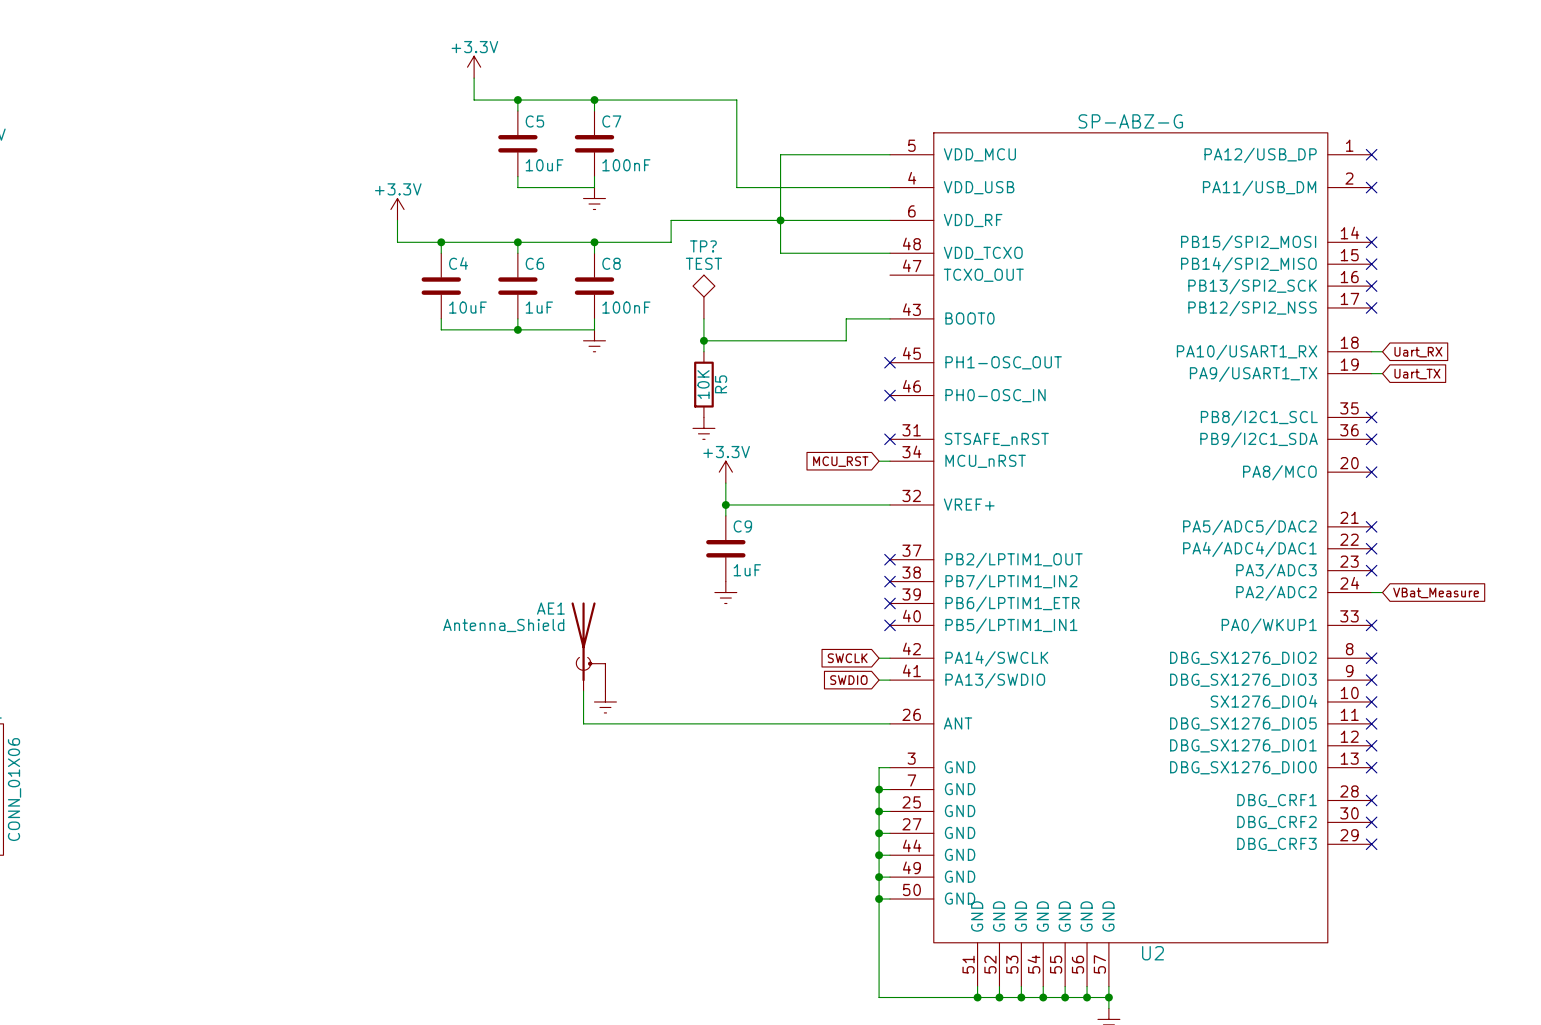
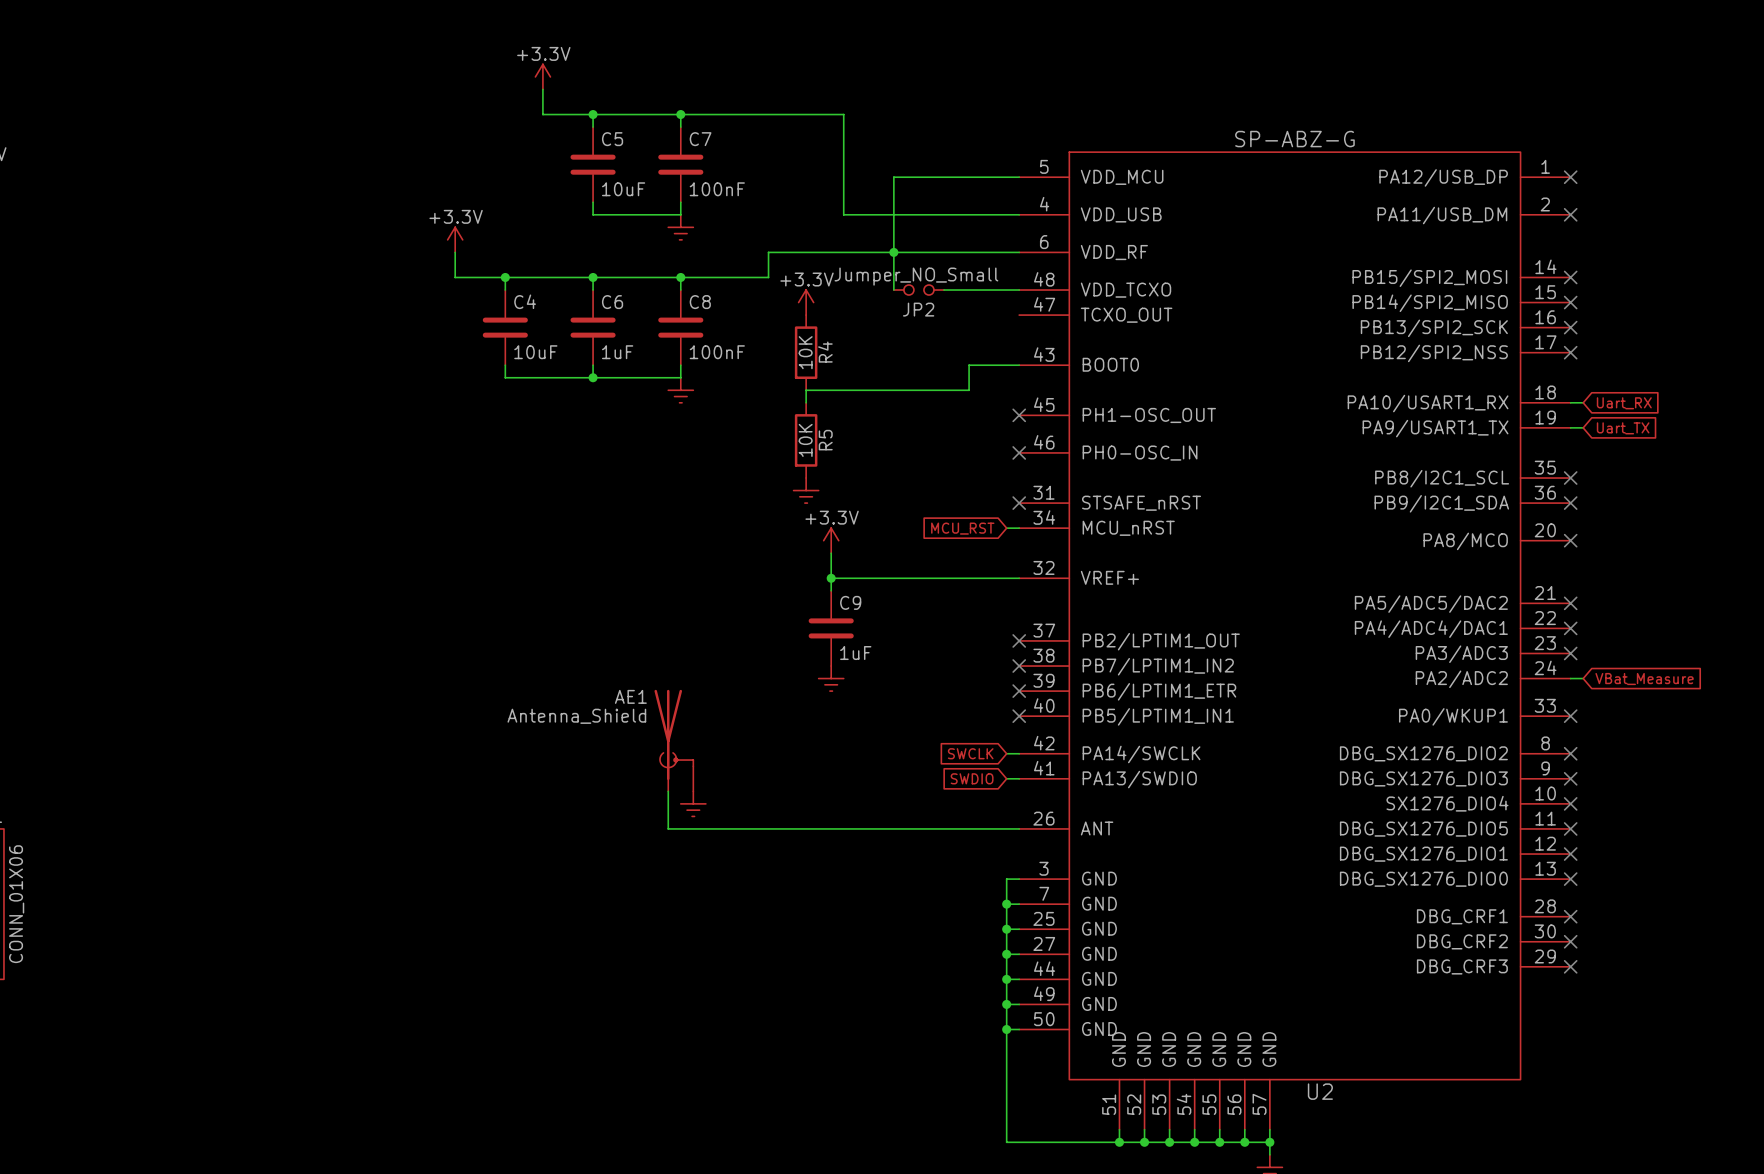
wire: (780, 253) (824, 253) -> none
JP2: none -> Jumper_NO_Small (918, 290)
power symbol: none -> +3.3V (806, 302)
TP?: TEST (703, 297) -> none
R4: none -> 10K (806, 352)
junction: (703, 340) -> none

